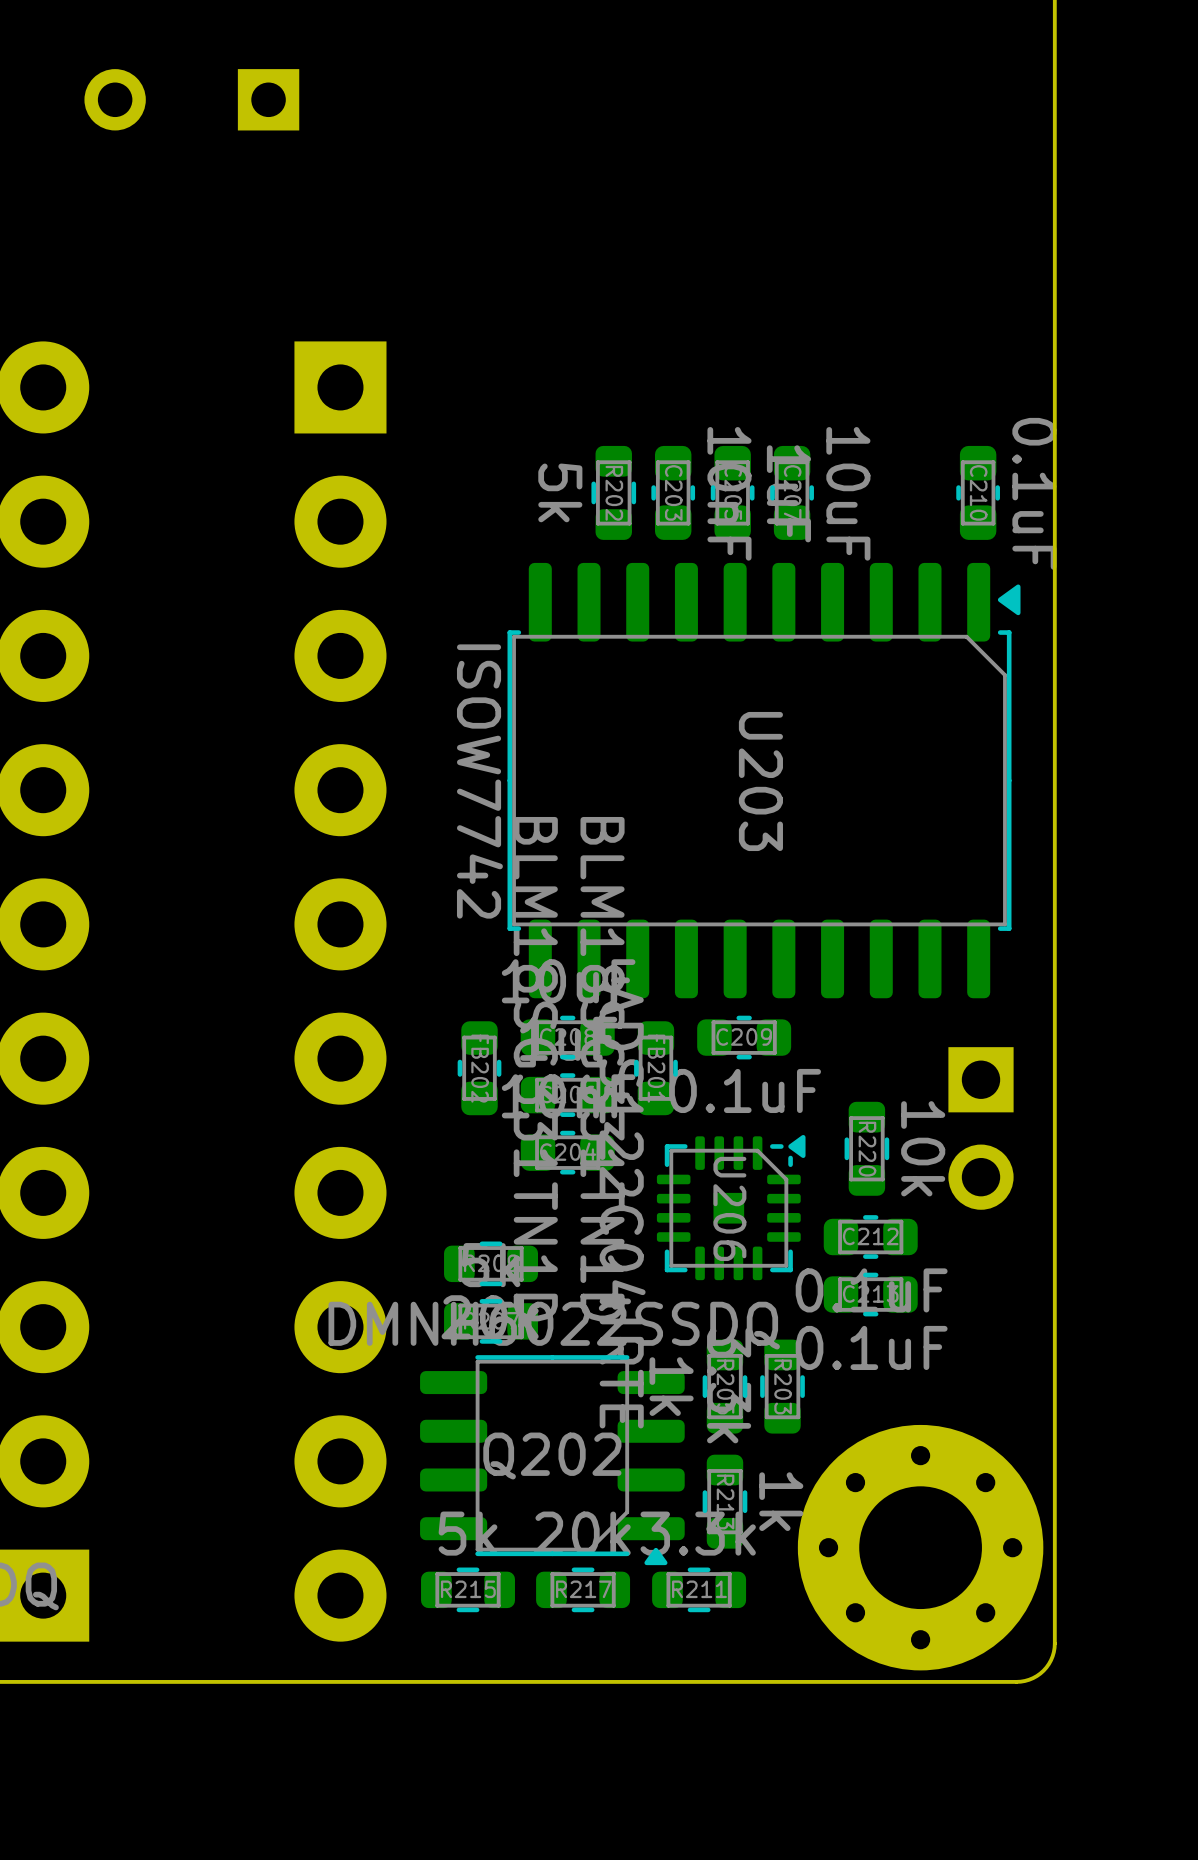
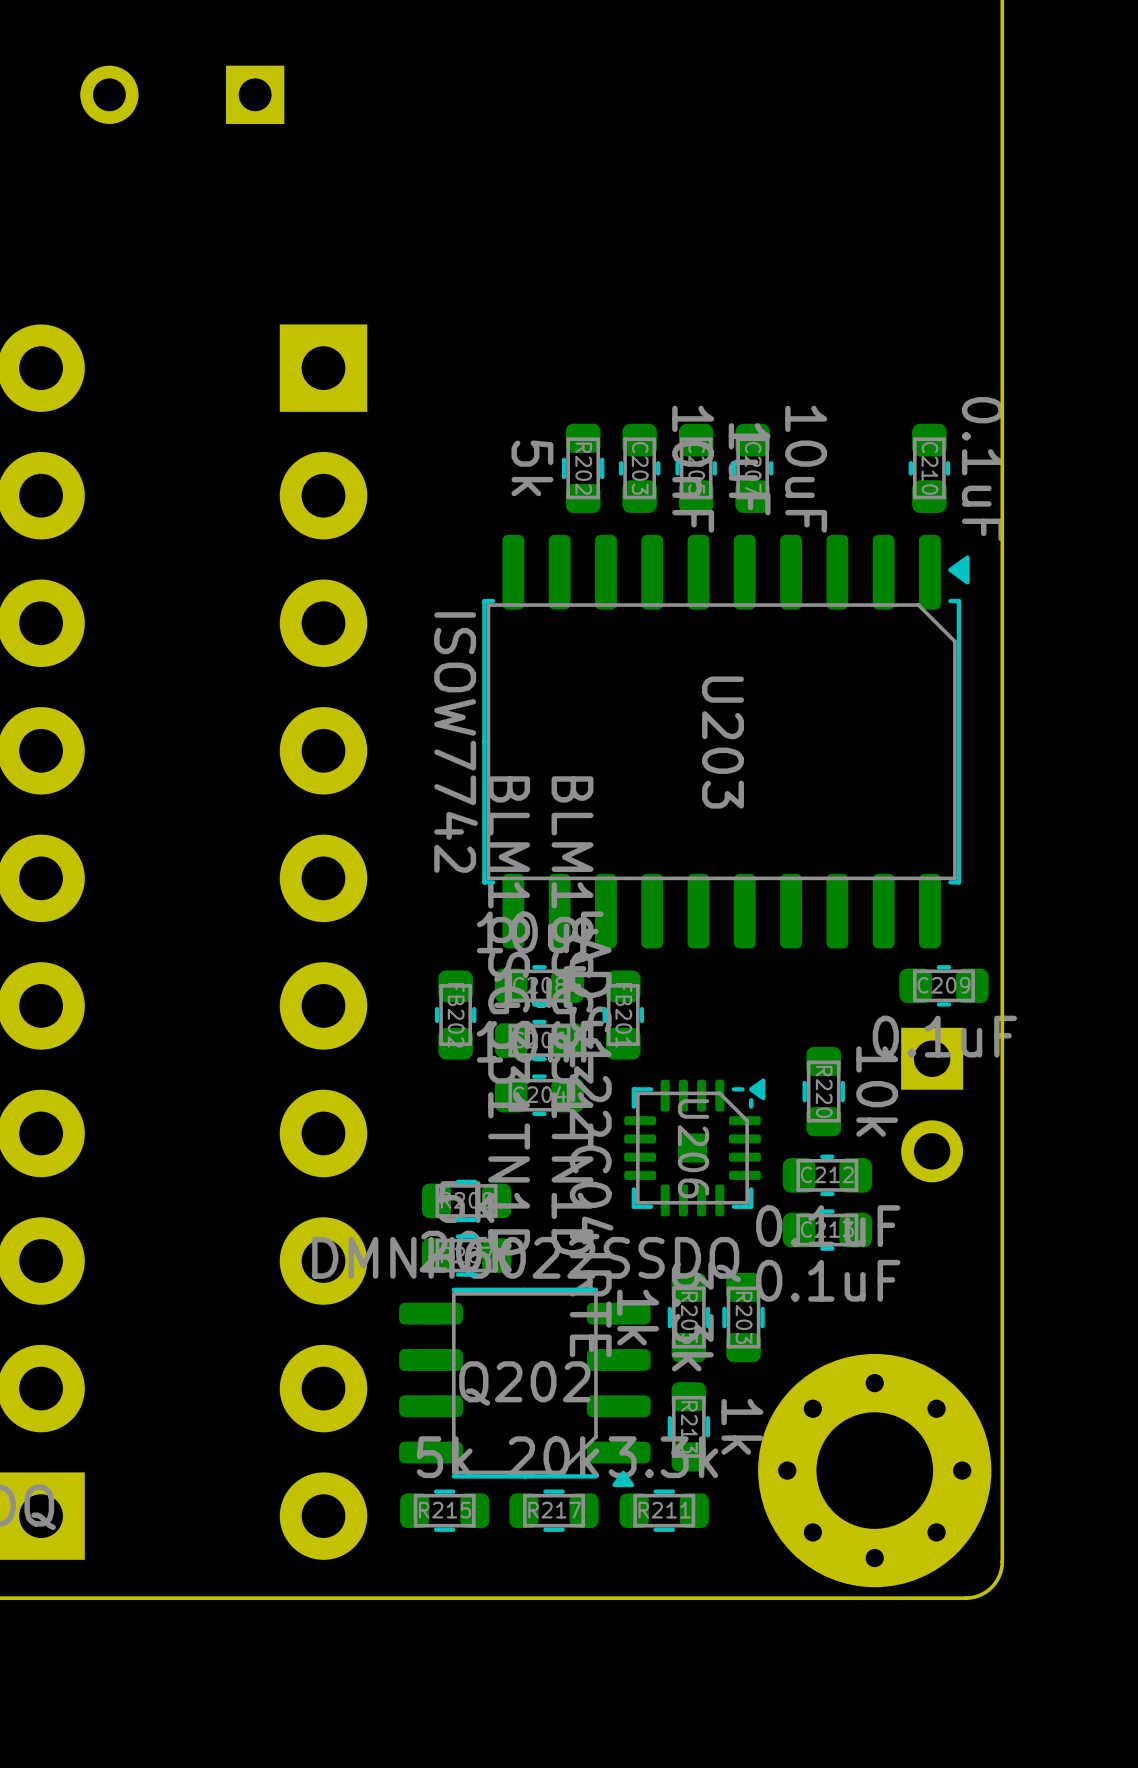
C209 position: (744, 1037) -> (943, 985)
part position: (981, 1128) -> (932, 1105)

